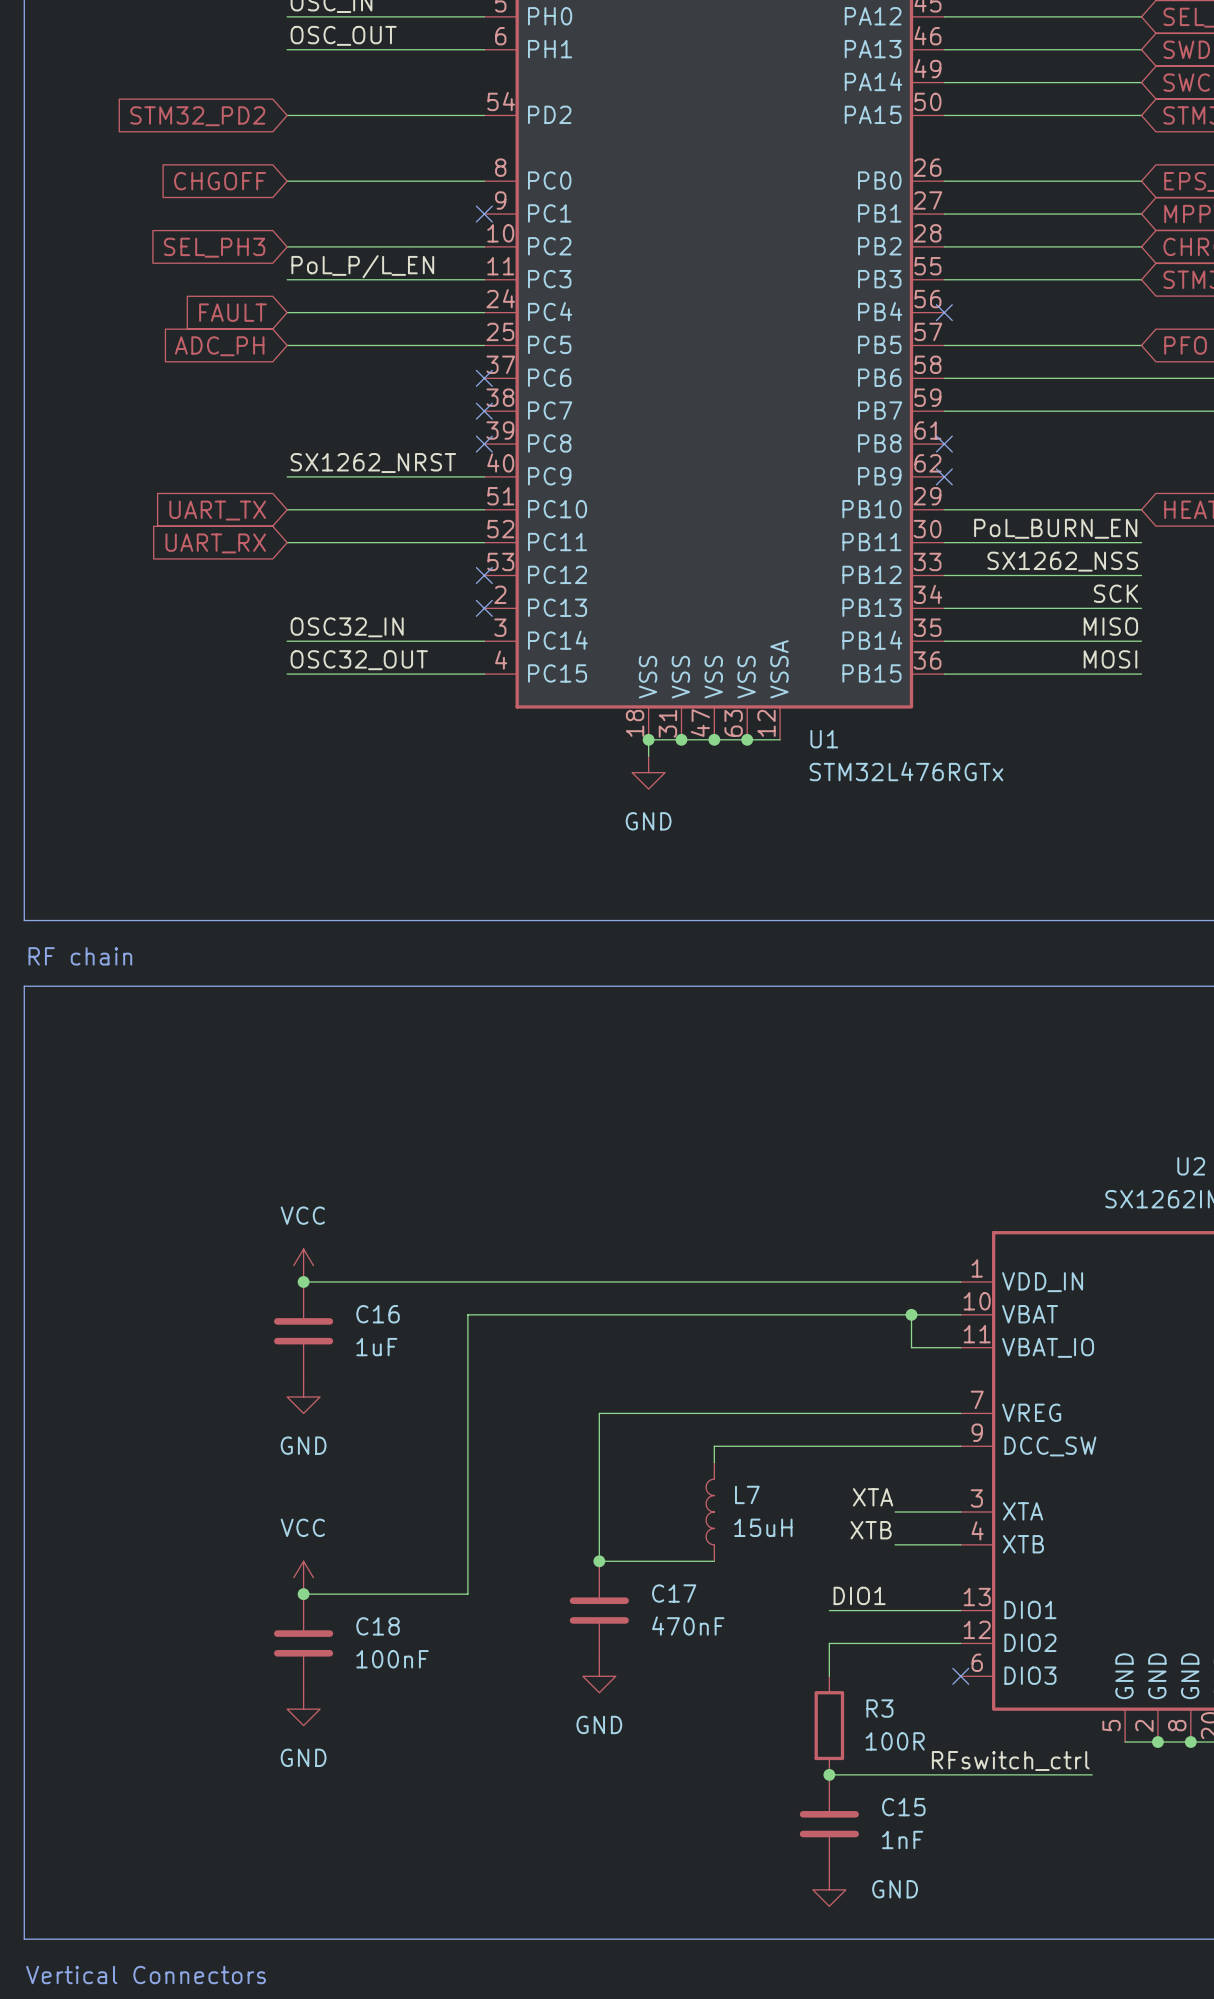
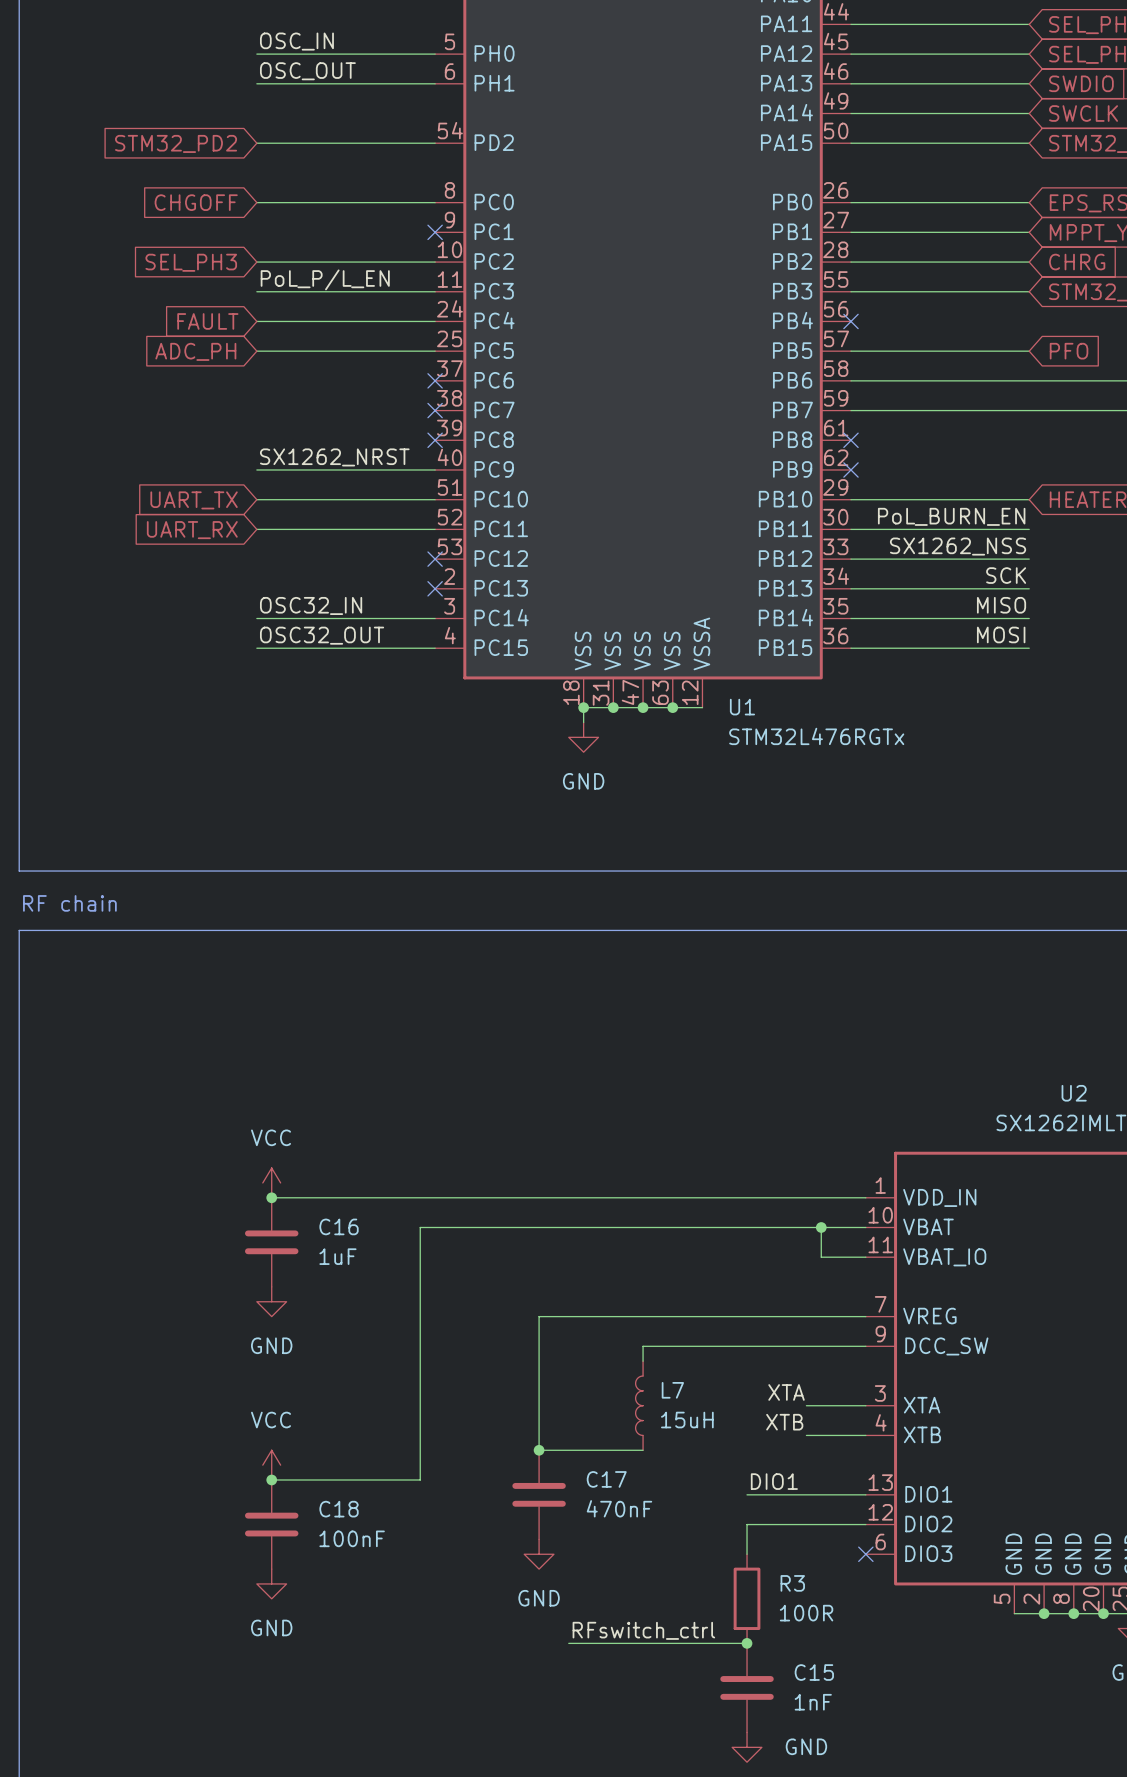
label: none -> RFswitch_ctrl (643, 1630)
label: RFswitch_ctrl (1010, 1761) -> none
wire: (829, 1774) (1092, 1774) -> (747, 1643) (568, 1643)

